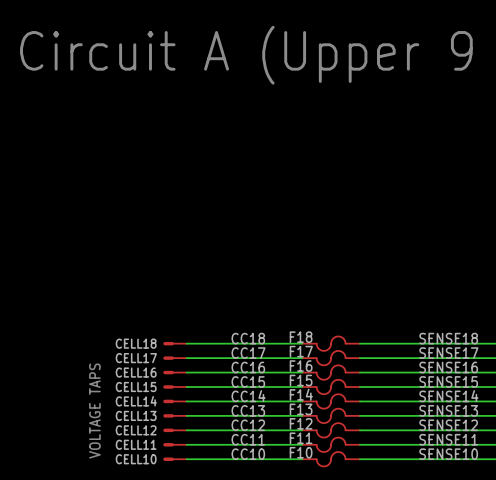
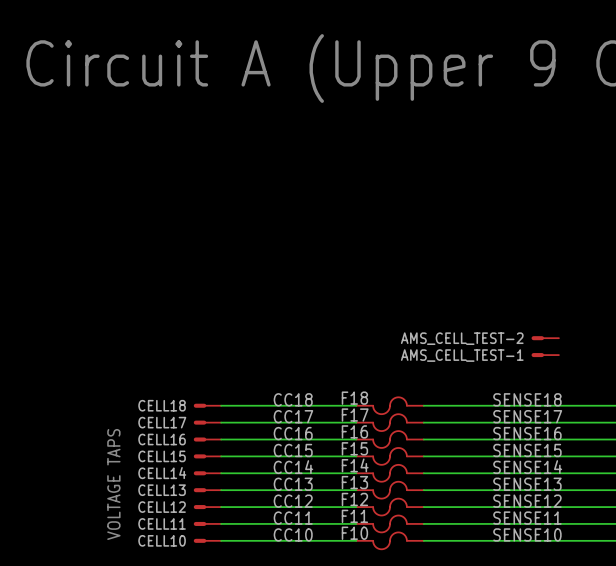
AMS_CELL_TEST-2: none -> (545, 338)
AMS_CELL_TEST-1: none -> (545, 355)

